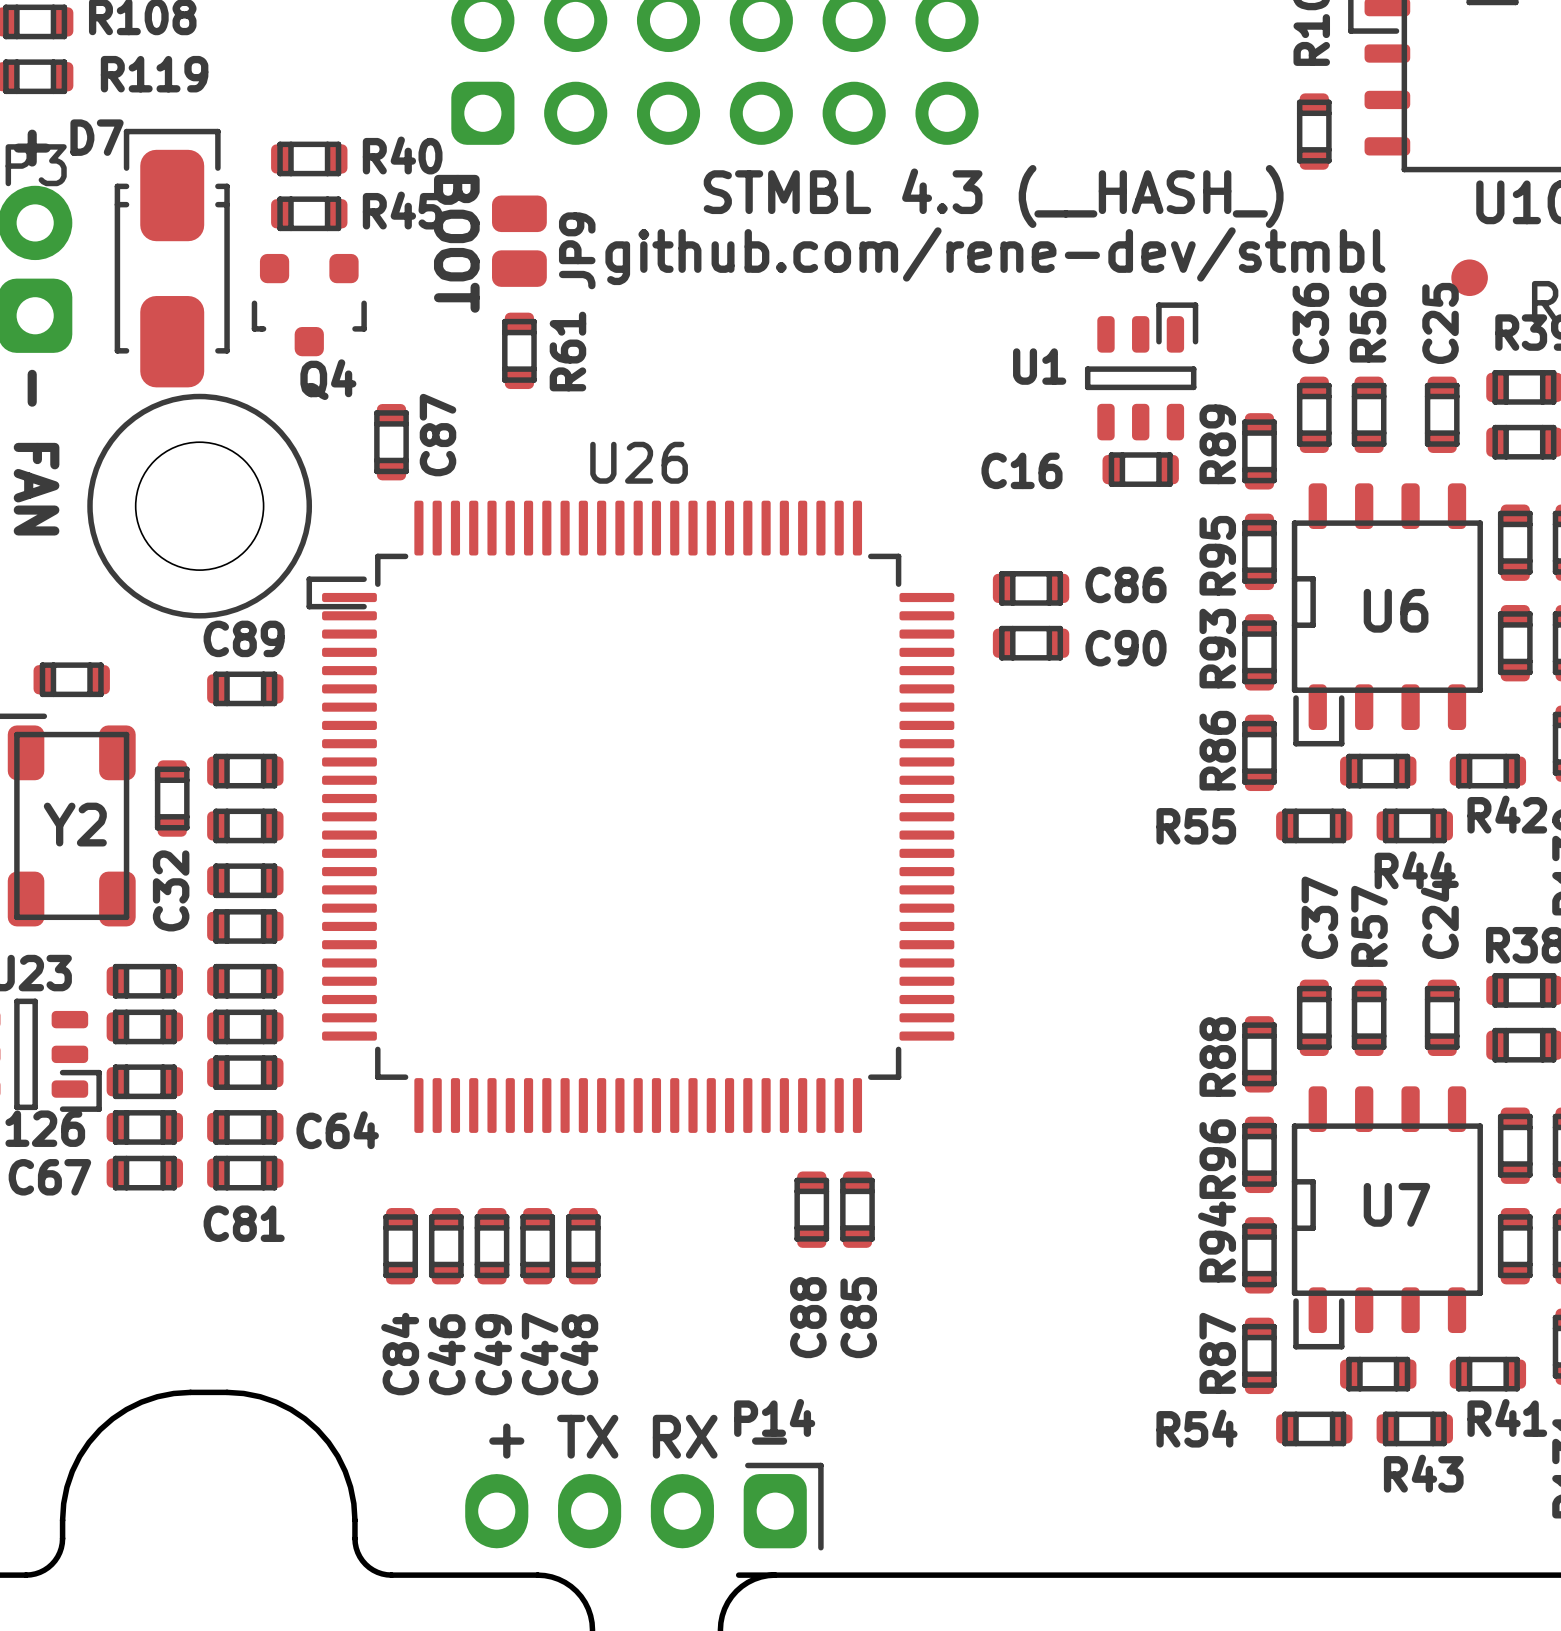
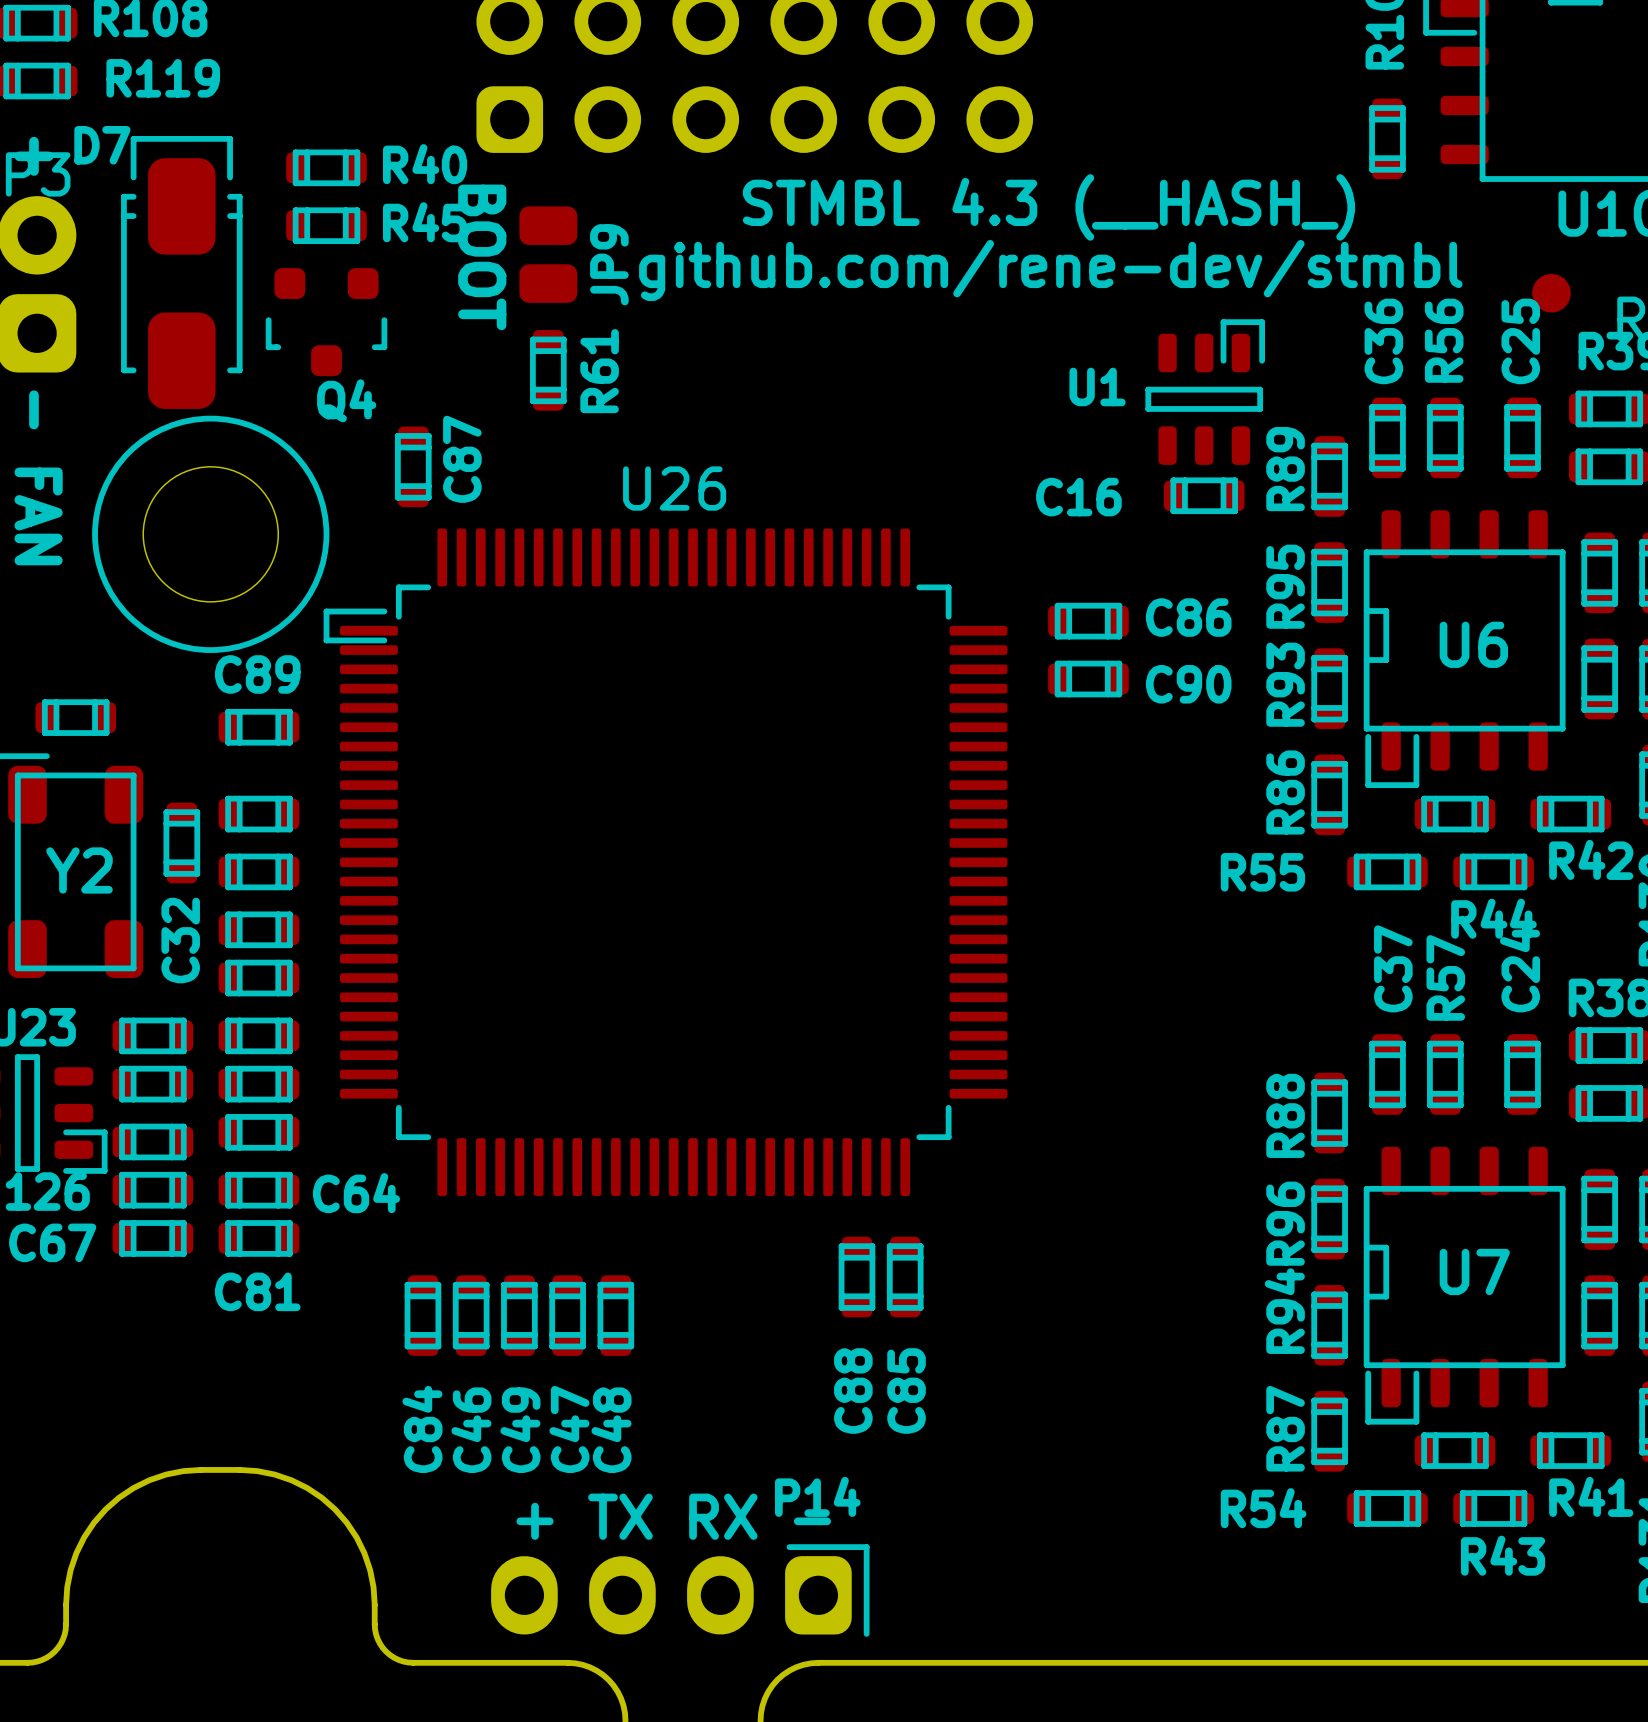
board edge: (738, 1575) (775, 1575) -> none

